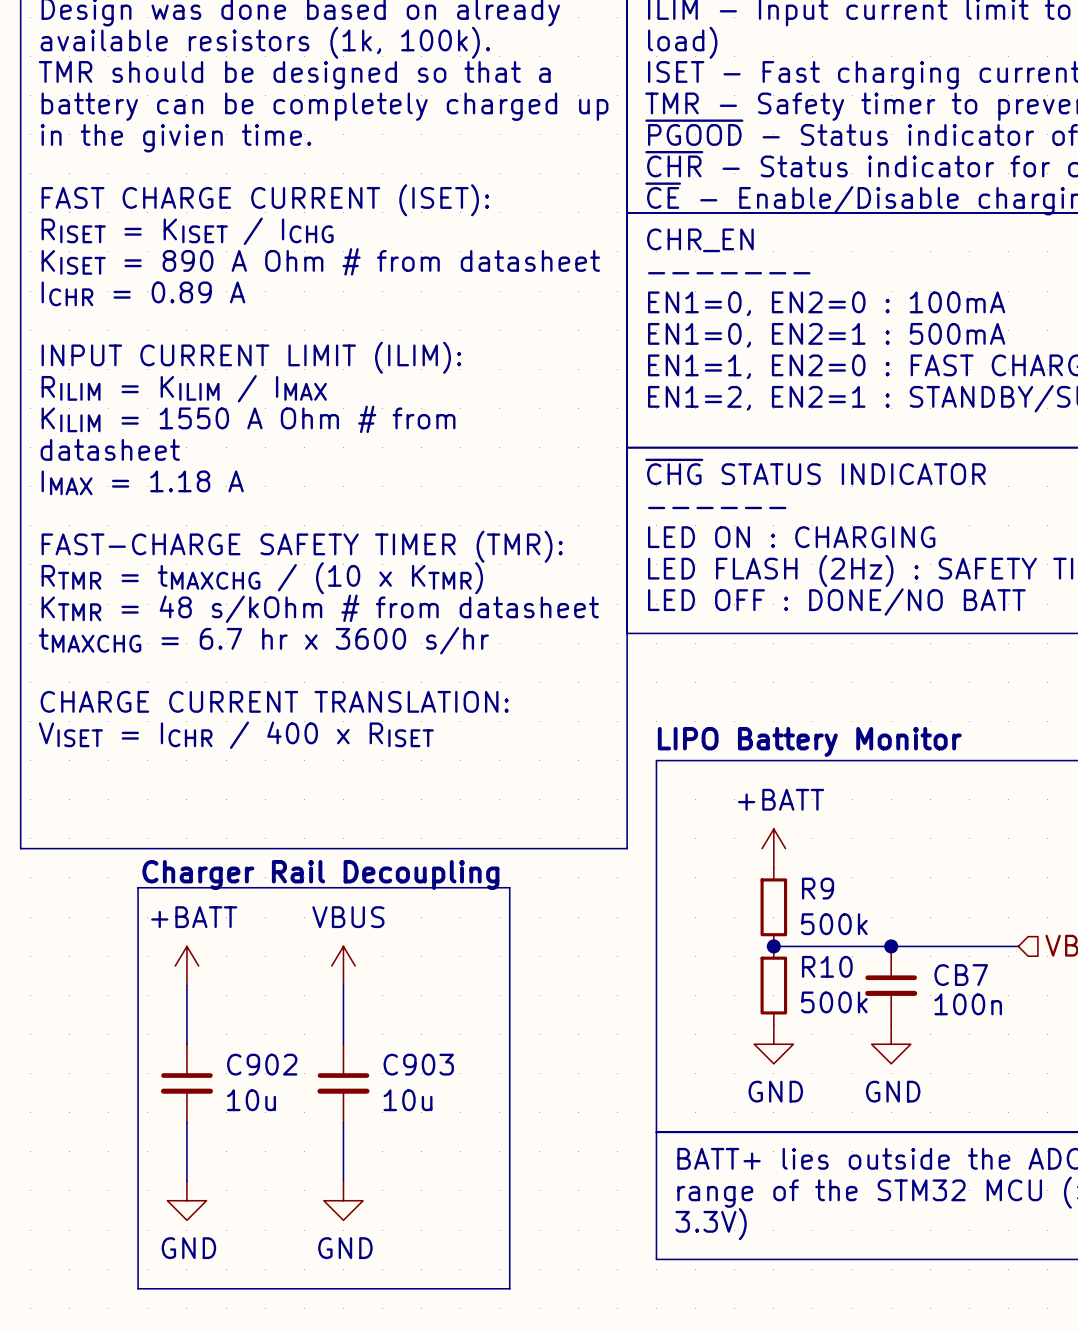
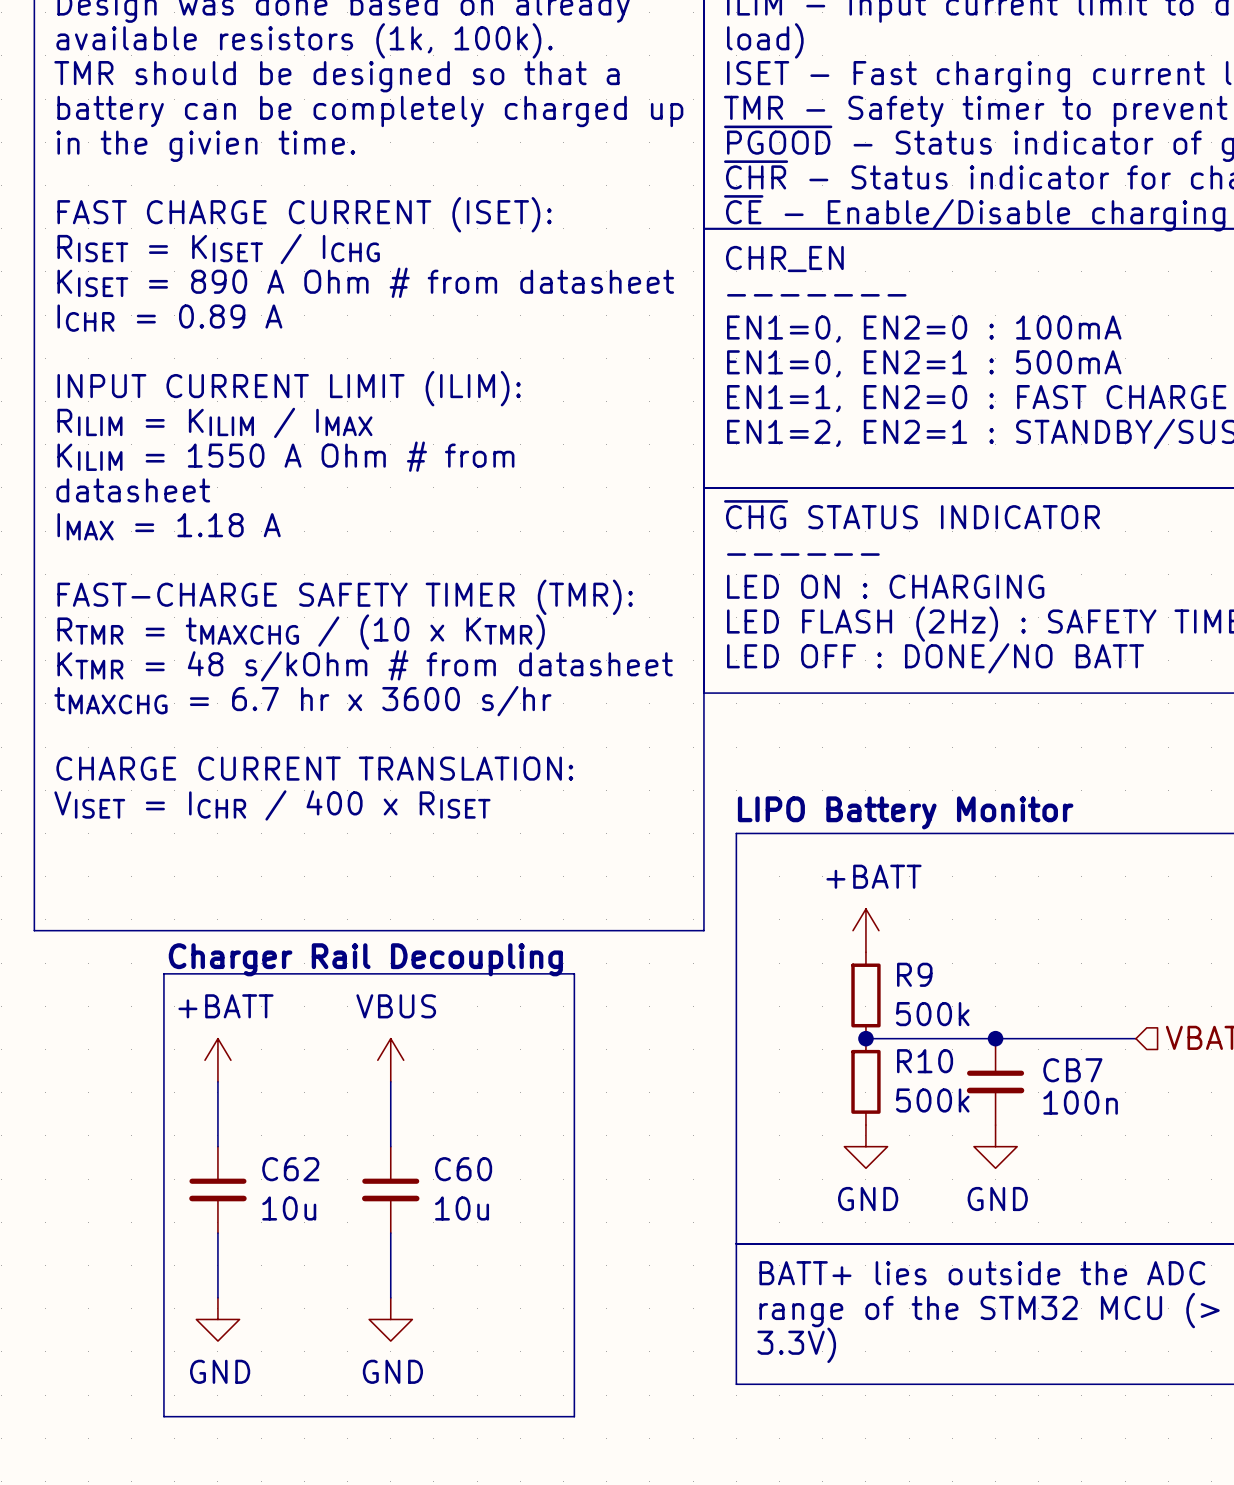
C902 name: C902 (262, 1064) -> C62 (290, 1169)
C903 name: C903 (418, 1064) -> C60 (463, 1169)

